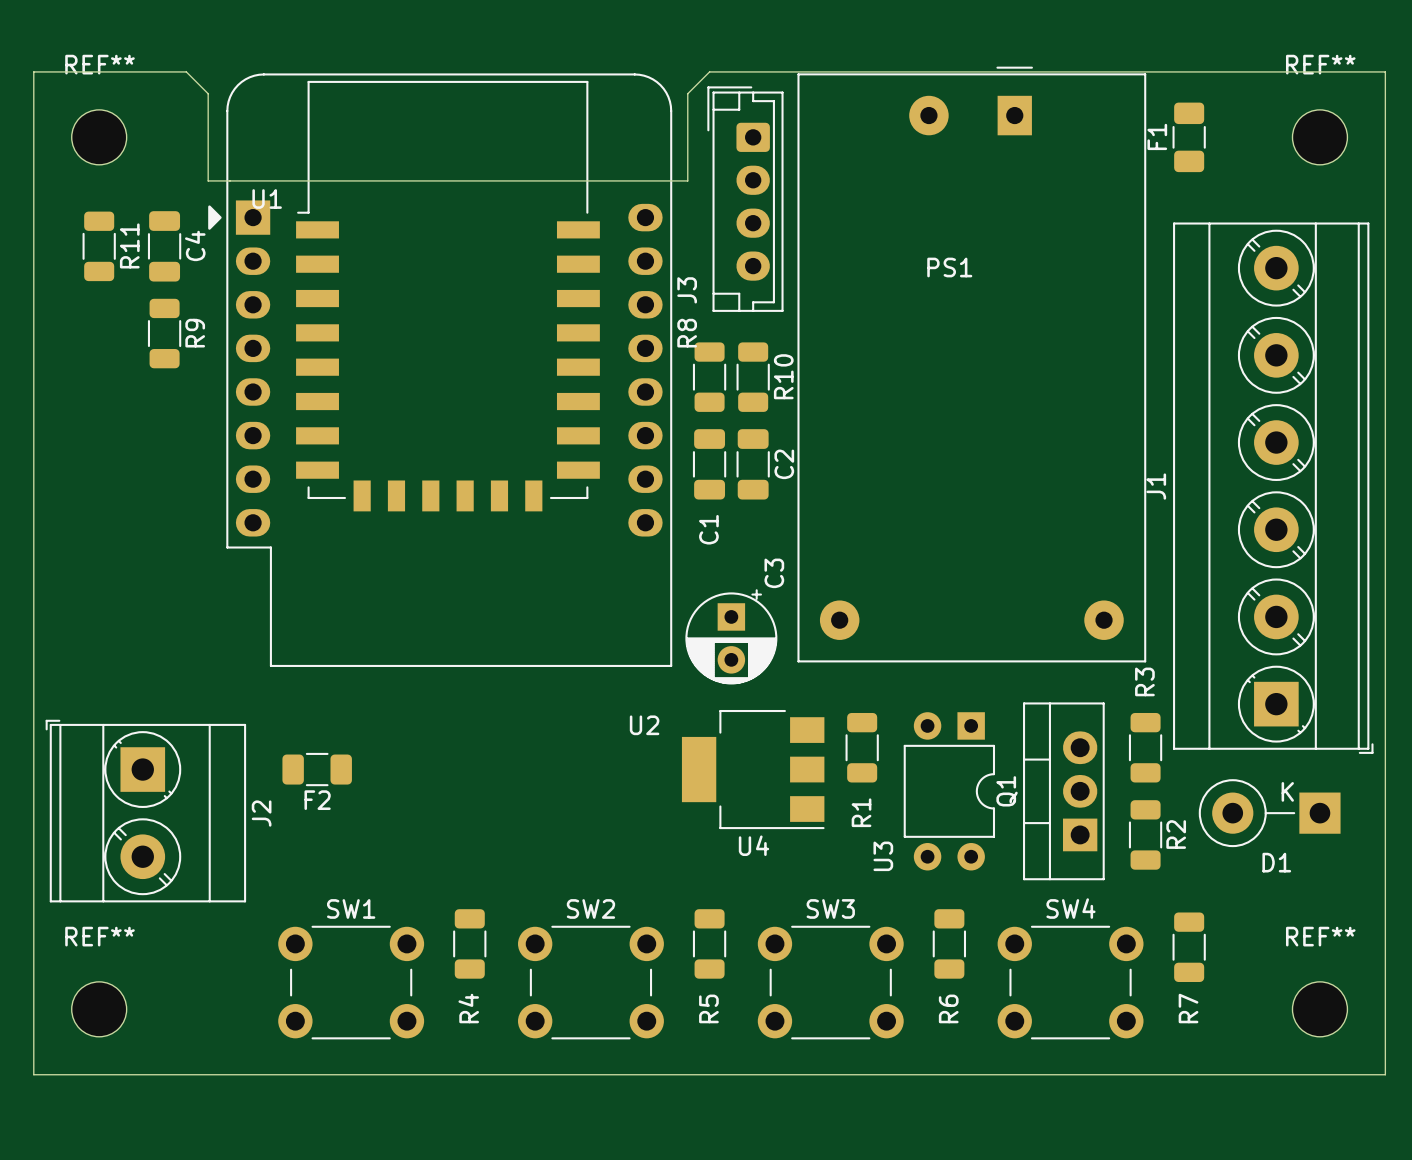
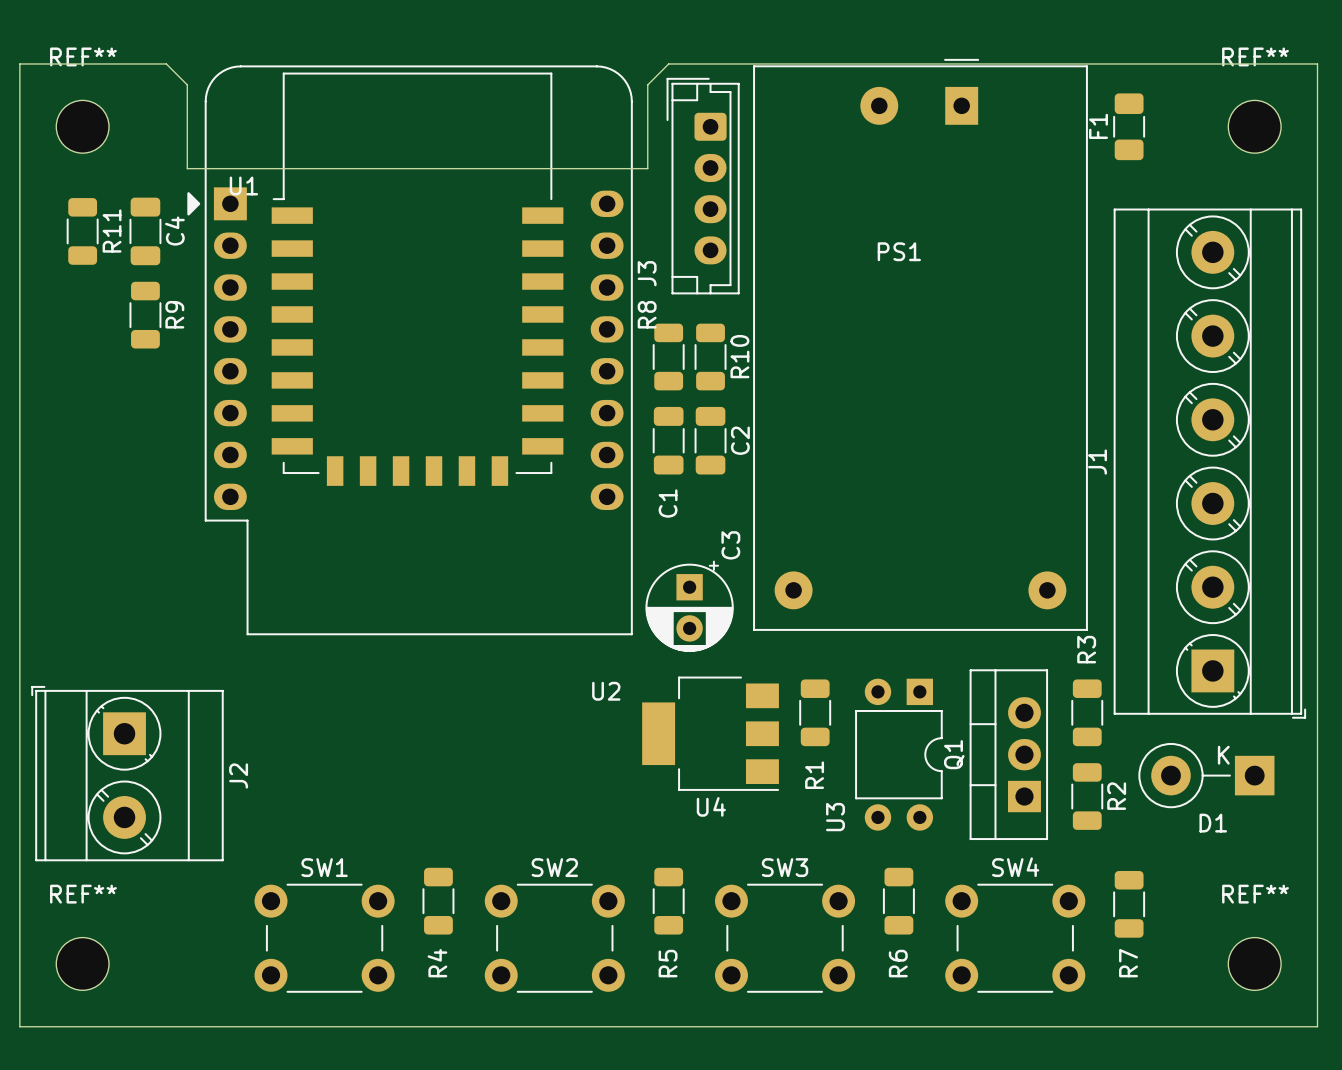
F2: (317, 769) -> none

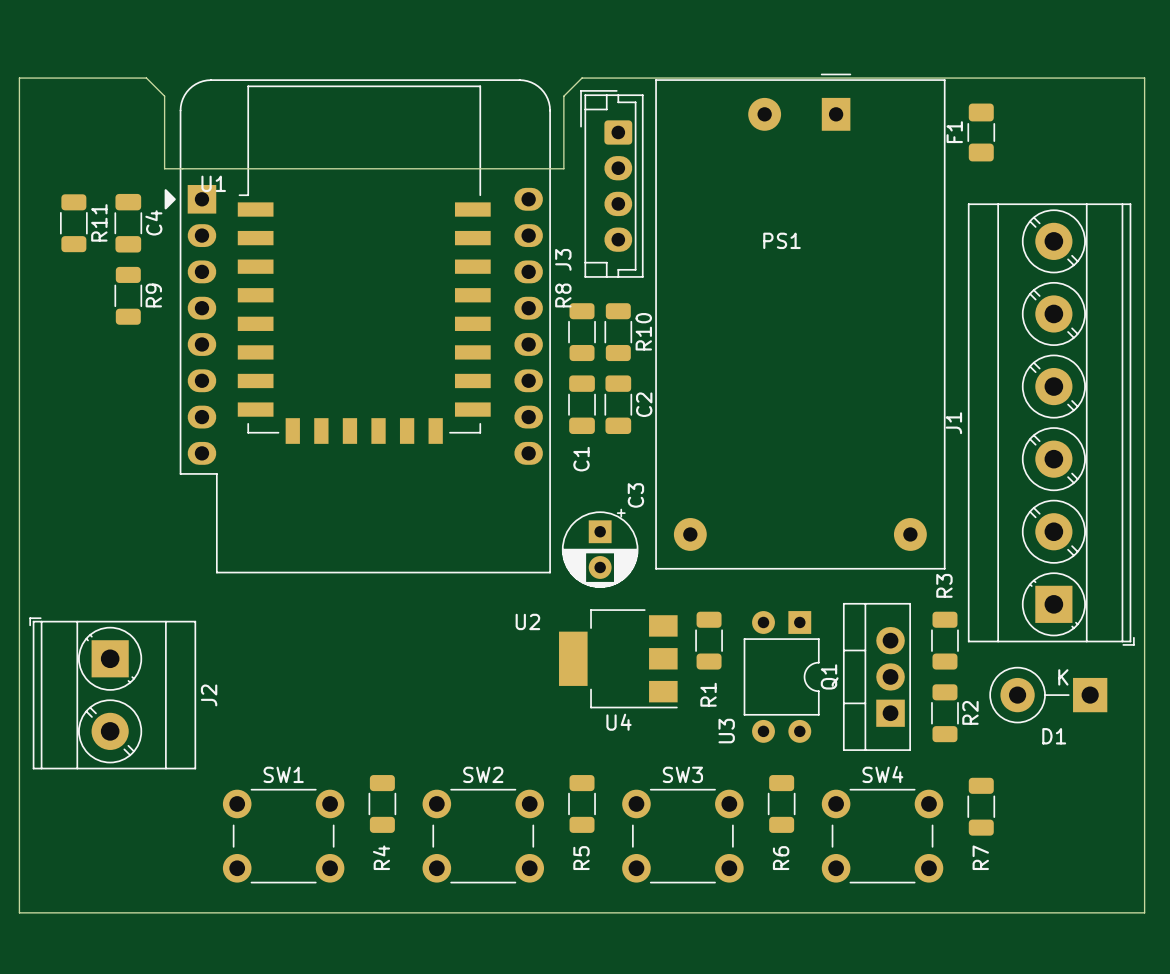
REF**: (82, 126) -> none
REF**: (1254, 126) -> none
REF**: (82, 963) -> none
REF**: (1254, 963) -> none

